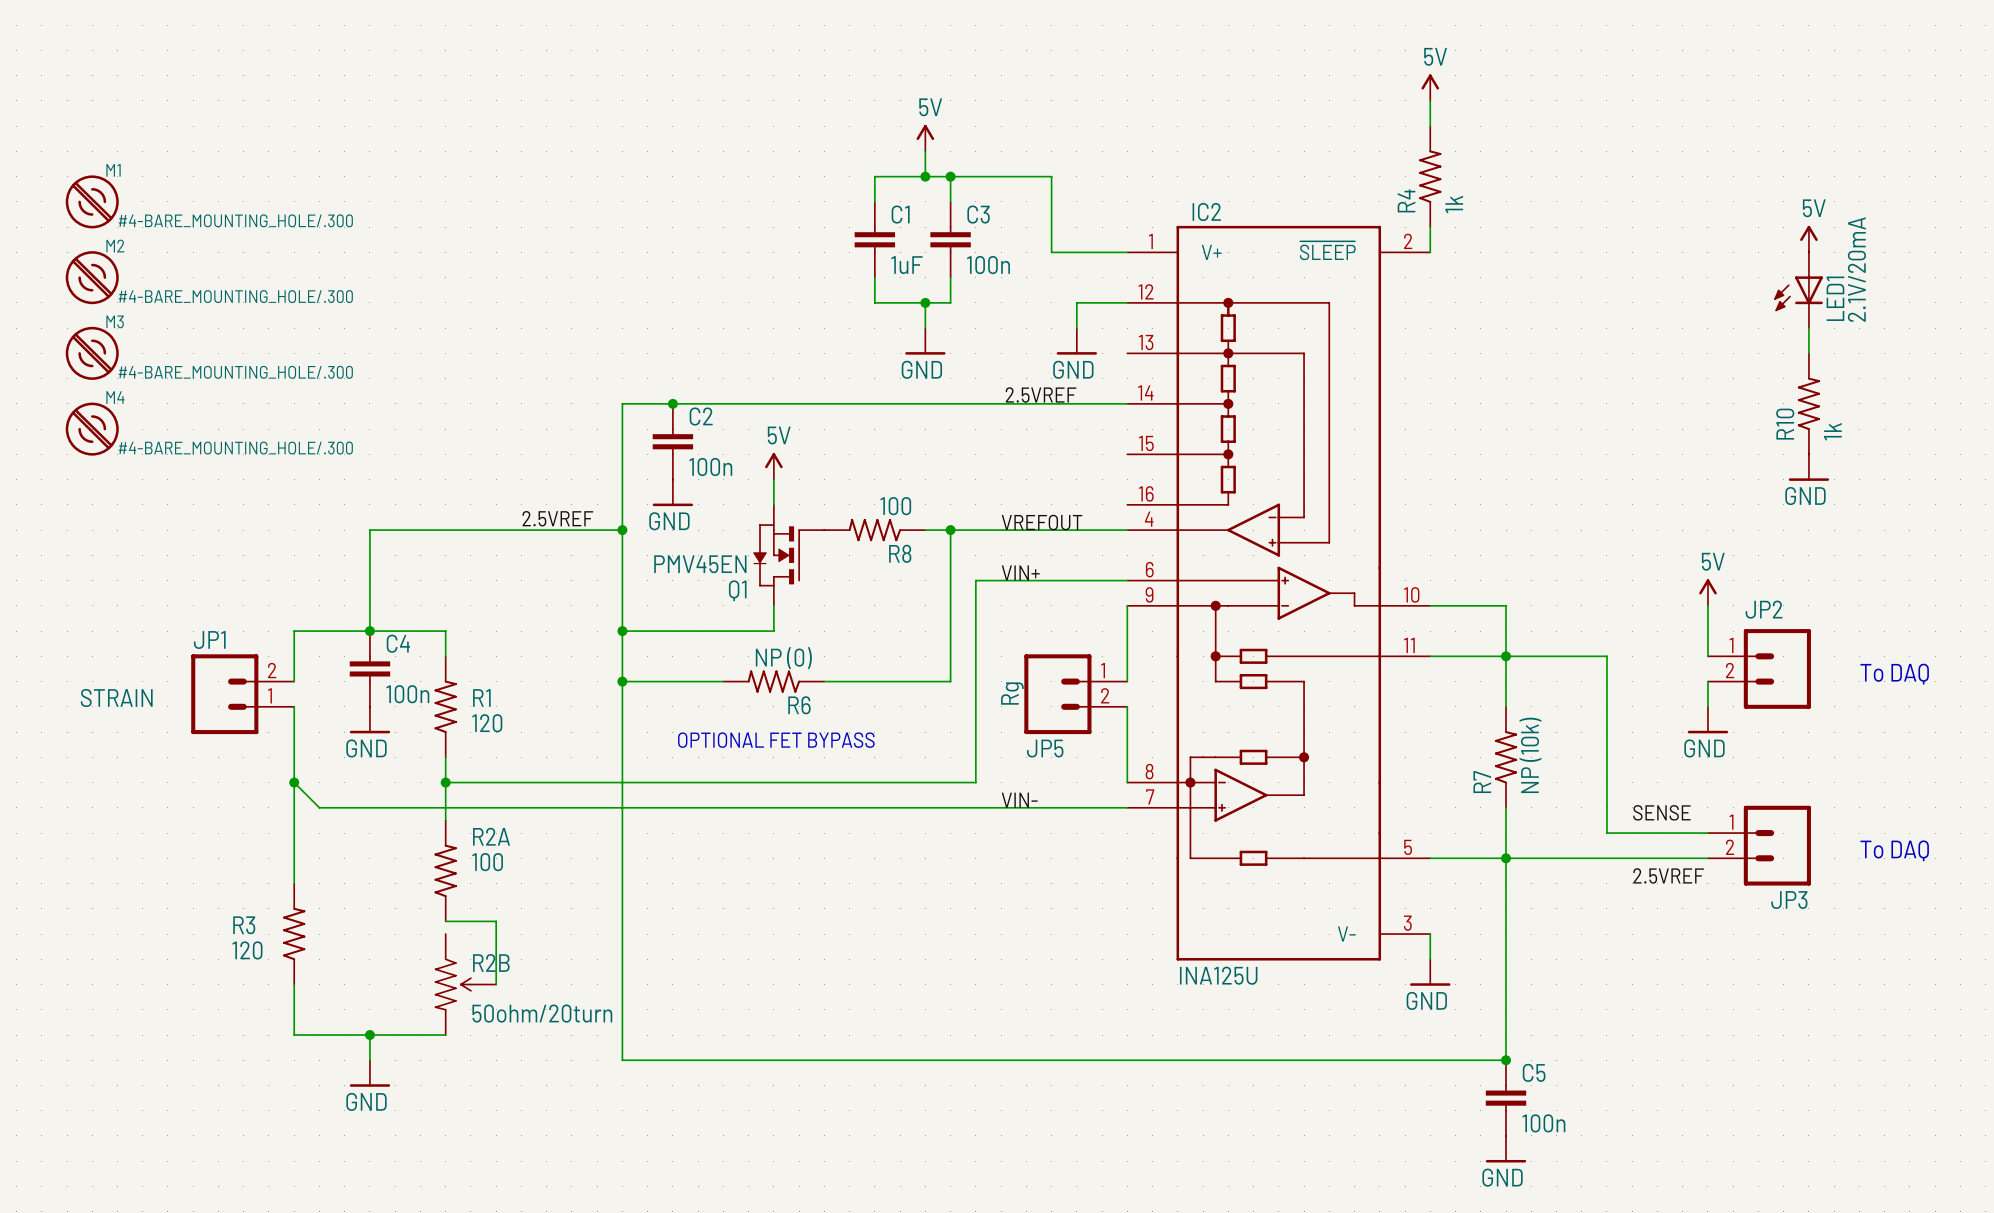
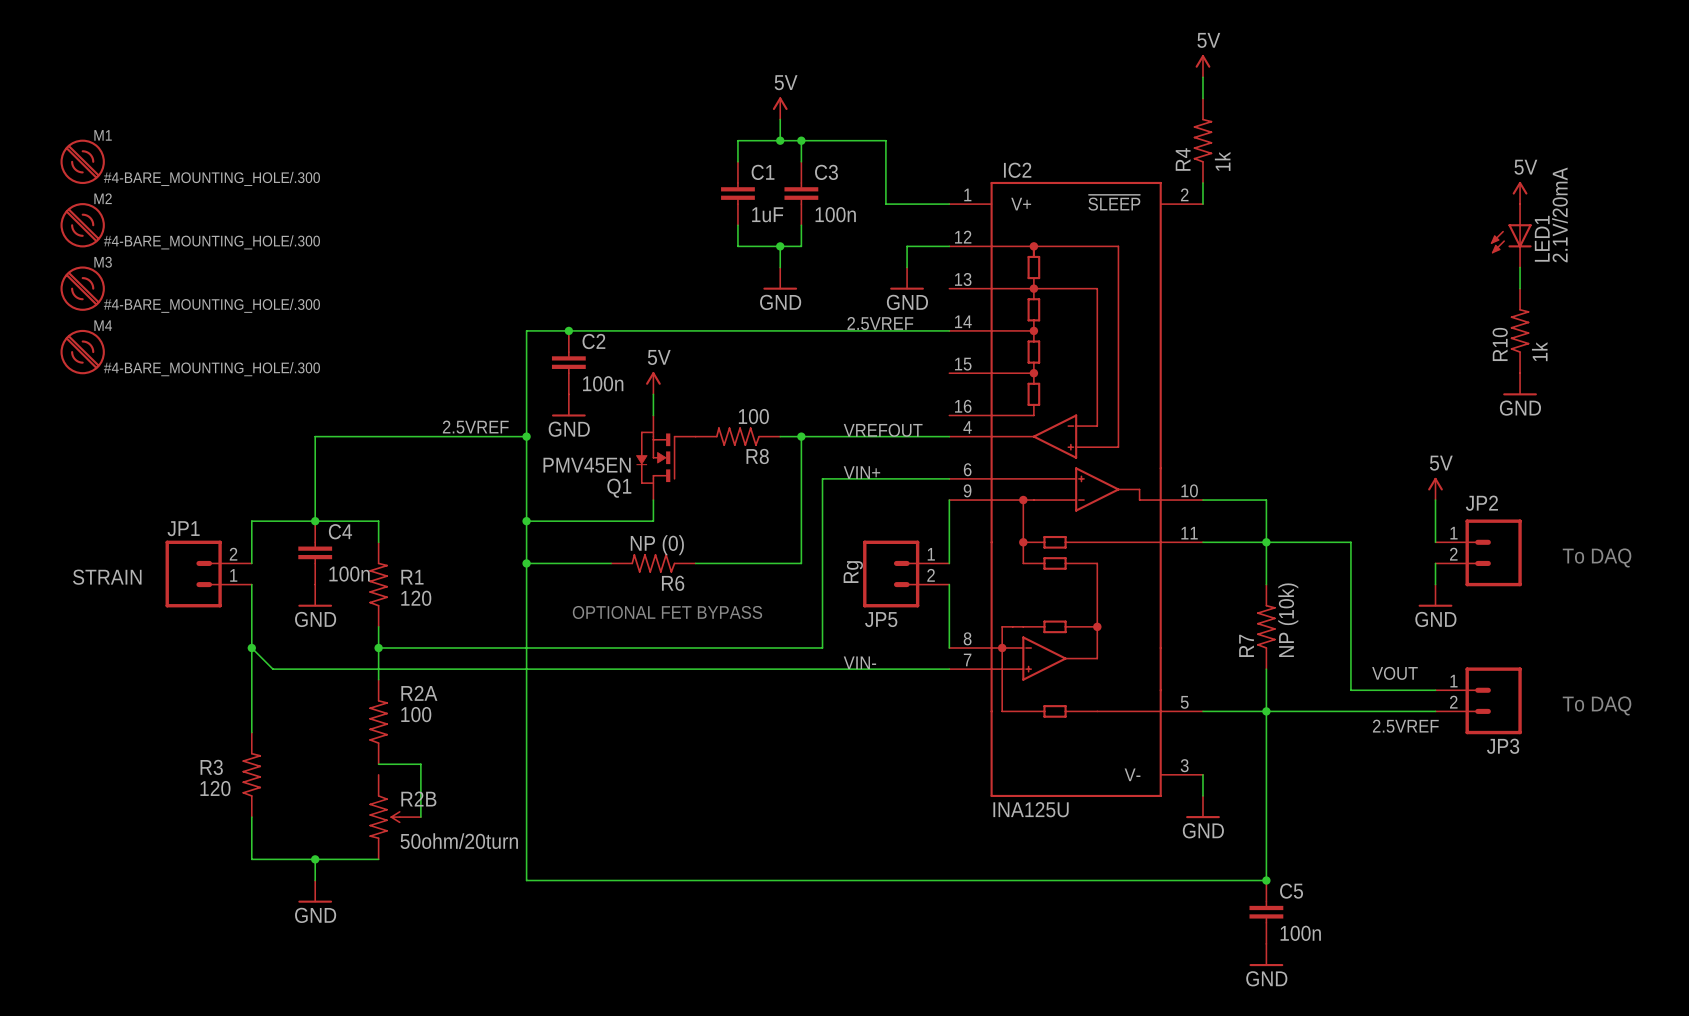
label: SENSE (1661, 812) -> VOUT (1394, 673)

